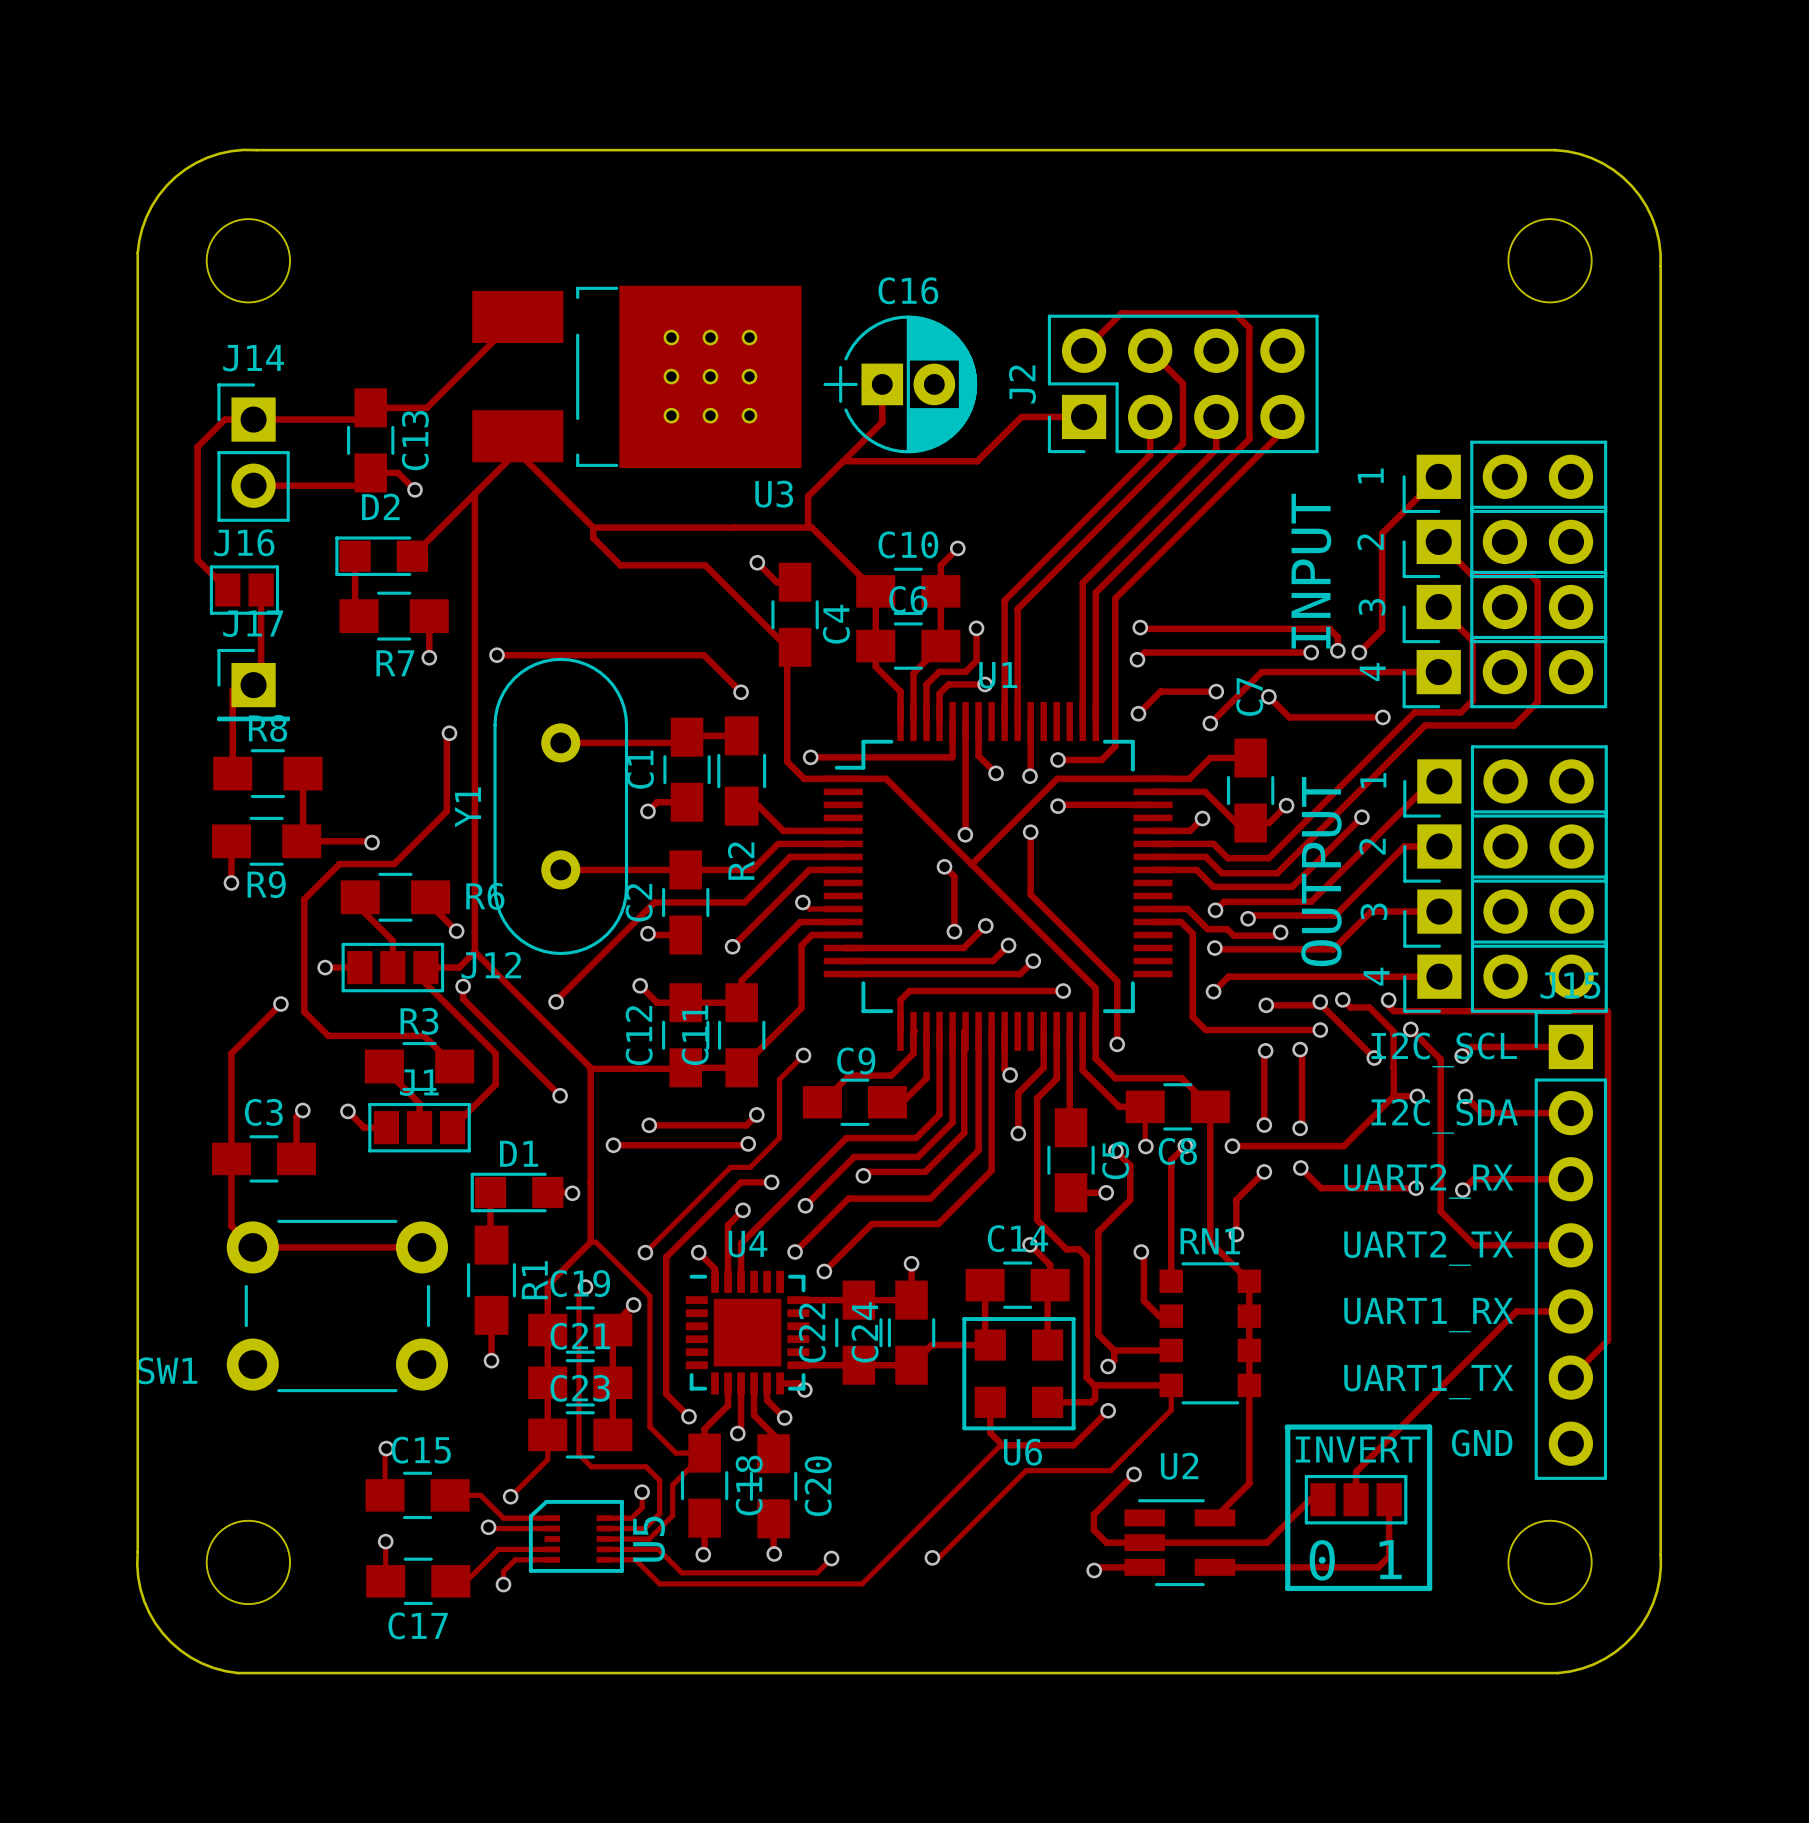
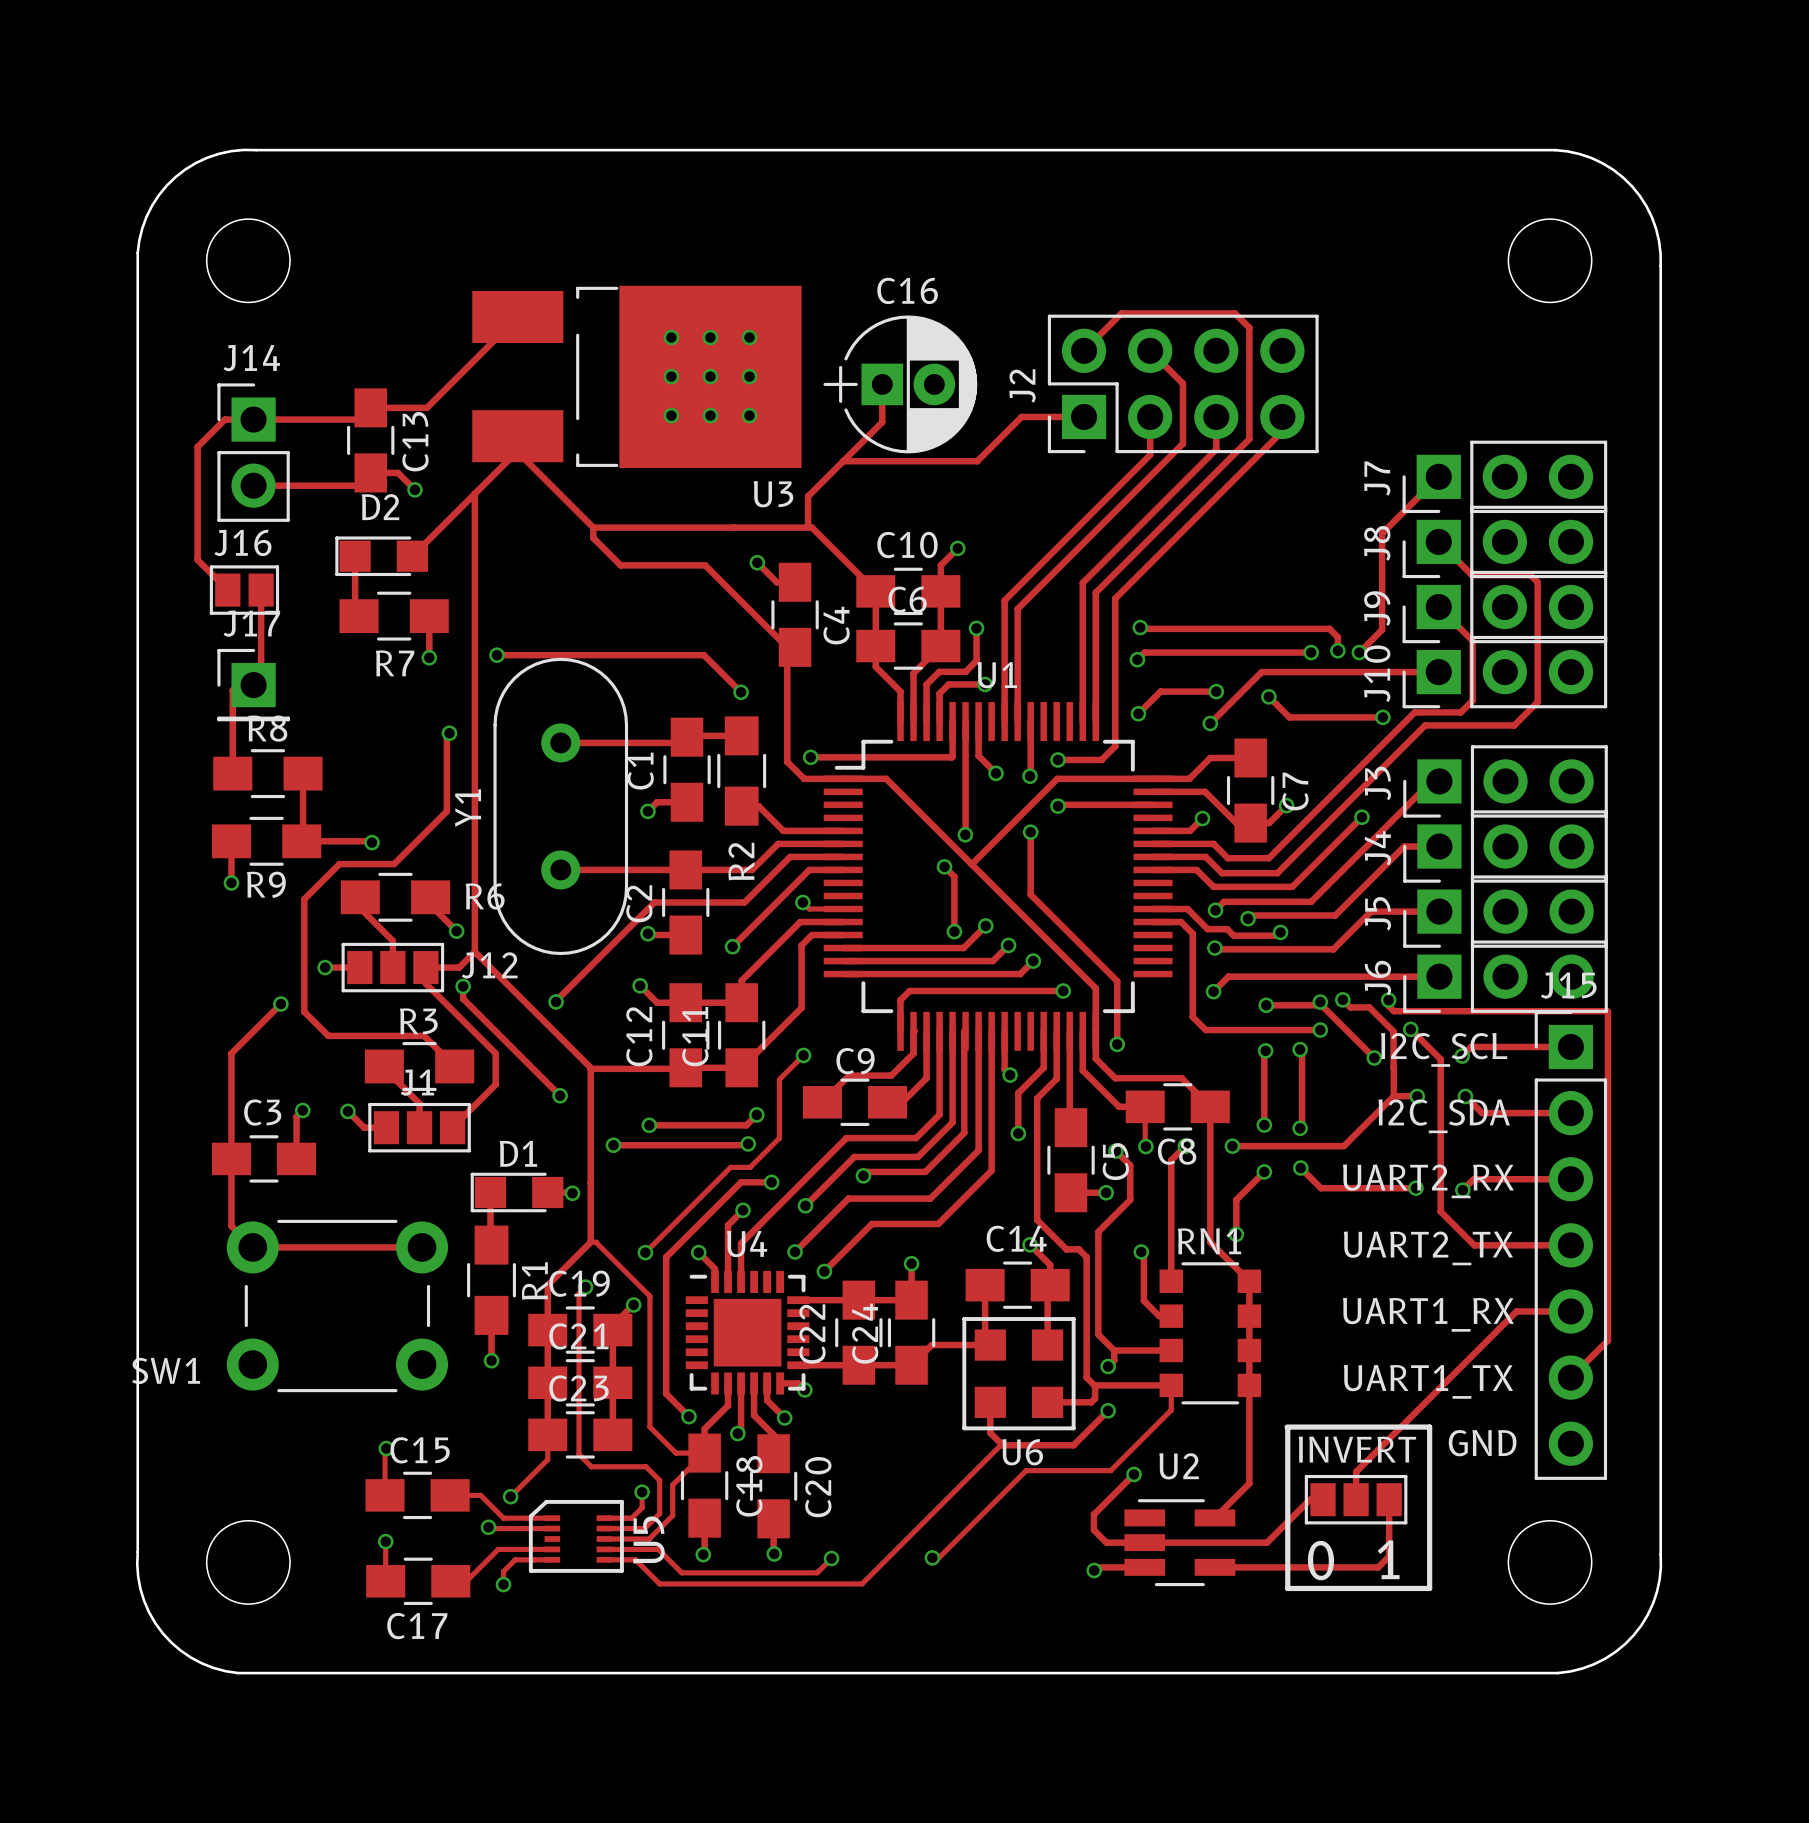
1 name: 1 (1370, 475) -> J7 (1377, 478)
2 name: 2 (1370, 542) -> J8 (1377, 543)
text: INPUT (1311, 571) -> none
3 name: 3 (1372, 607) -> J9 (1377, 608)
4 name: 4 (1372, 672) -> J10 (1377, 673)
C7 name position: C7 (1249, 696) -> C7 (1295, 791)
1 name: 1 (1373, 780) -> J3 (1377, 783)
2 name: 2 (1372, 846) -> J4 (1377, 848)
text: OUTPUT (1321, 871) -> none
3 name: 3 (1374, 911) -> J5 (1377, 913)
4 name: 4 (1376, 976) -> J6 (1377, 978)

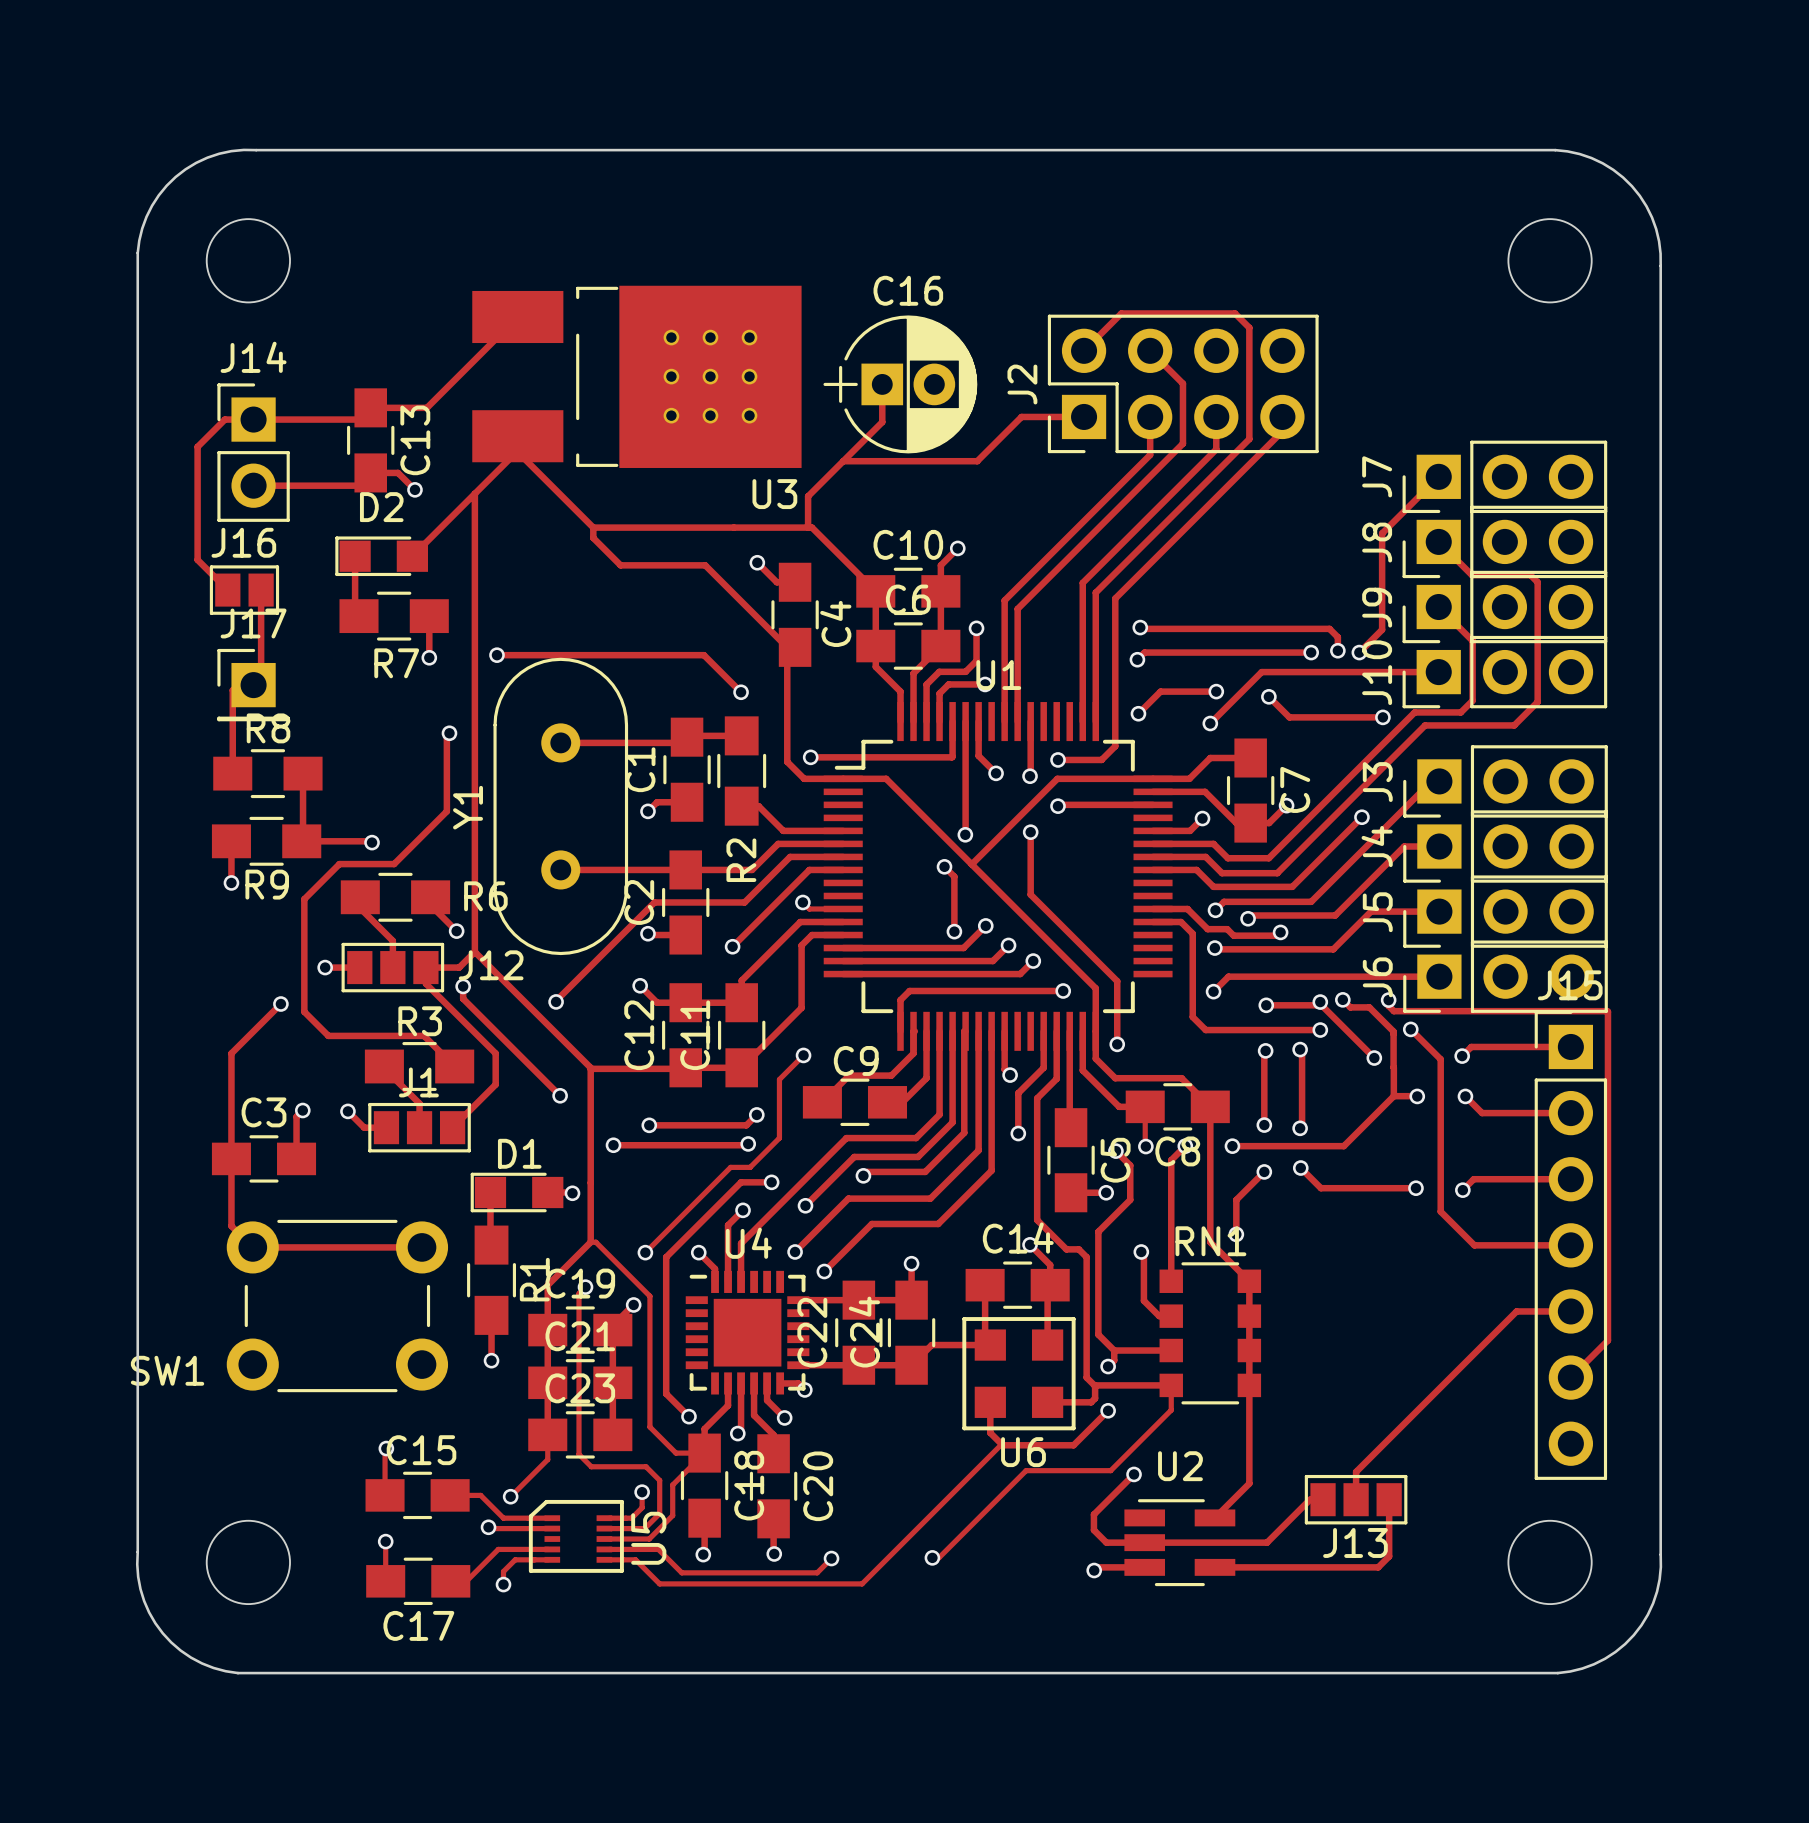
text: I2C_SCL (1444, 1049) -> none
text: I2C_SDA (1444, 1116) -> none
text: UART2_RX (1428, 1181) -> none
text: UART2_TX (1428, 1248) -> none
text: UART1_RX (1428, 1314) -> none
text: UART1_TX (1428, 1381) -> none
line: (1287, 1427) (1429, 1427) (1429, 1588) (1287, 1588) (1287, 1428) -> none
text: GND (1482, 1443) -> none
text: INVERT (1357, 1449) -> none
J13 name: none -> J13 (1355, 1542)
text: 1 (1388, 1559) -> none
text: 0 (1320, 1560) -> none

